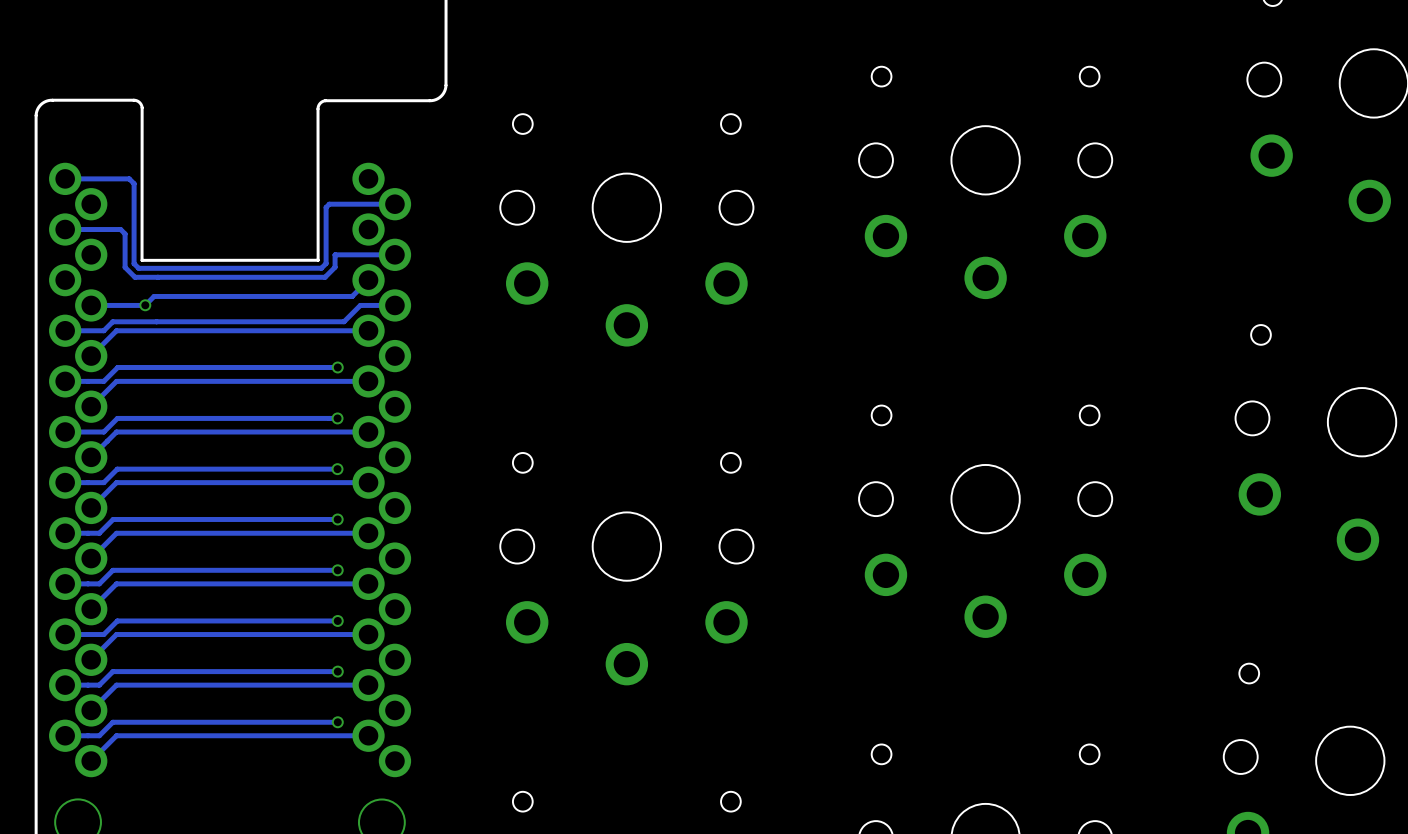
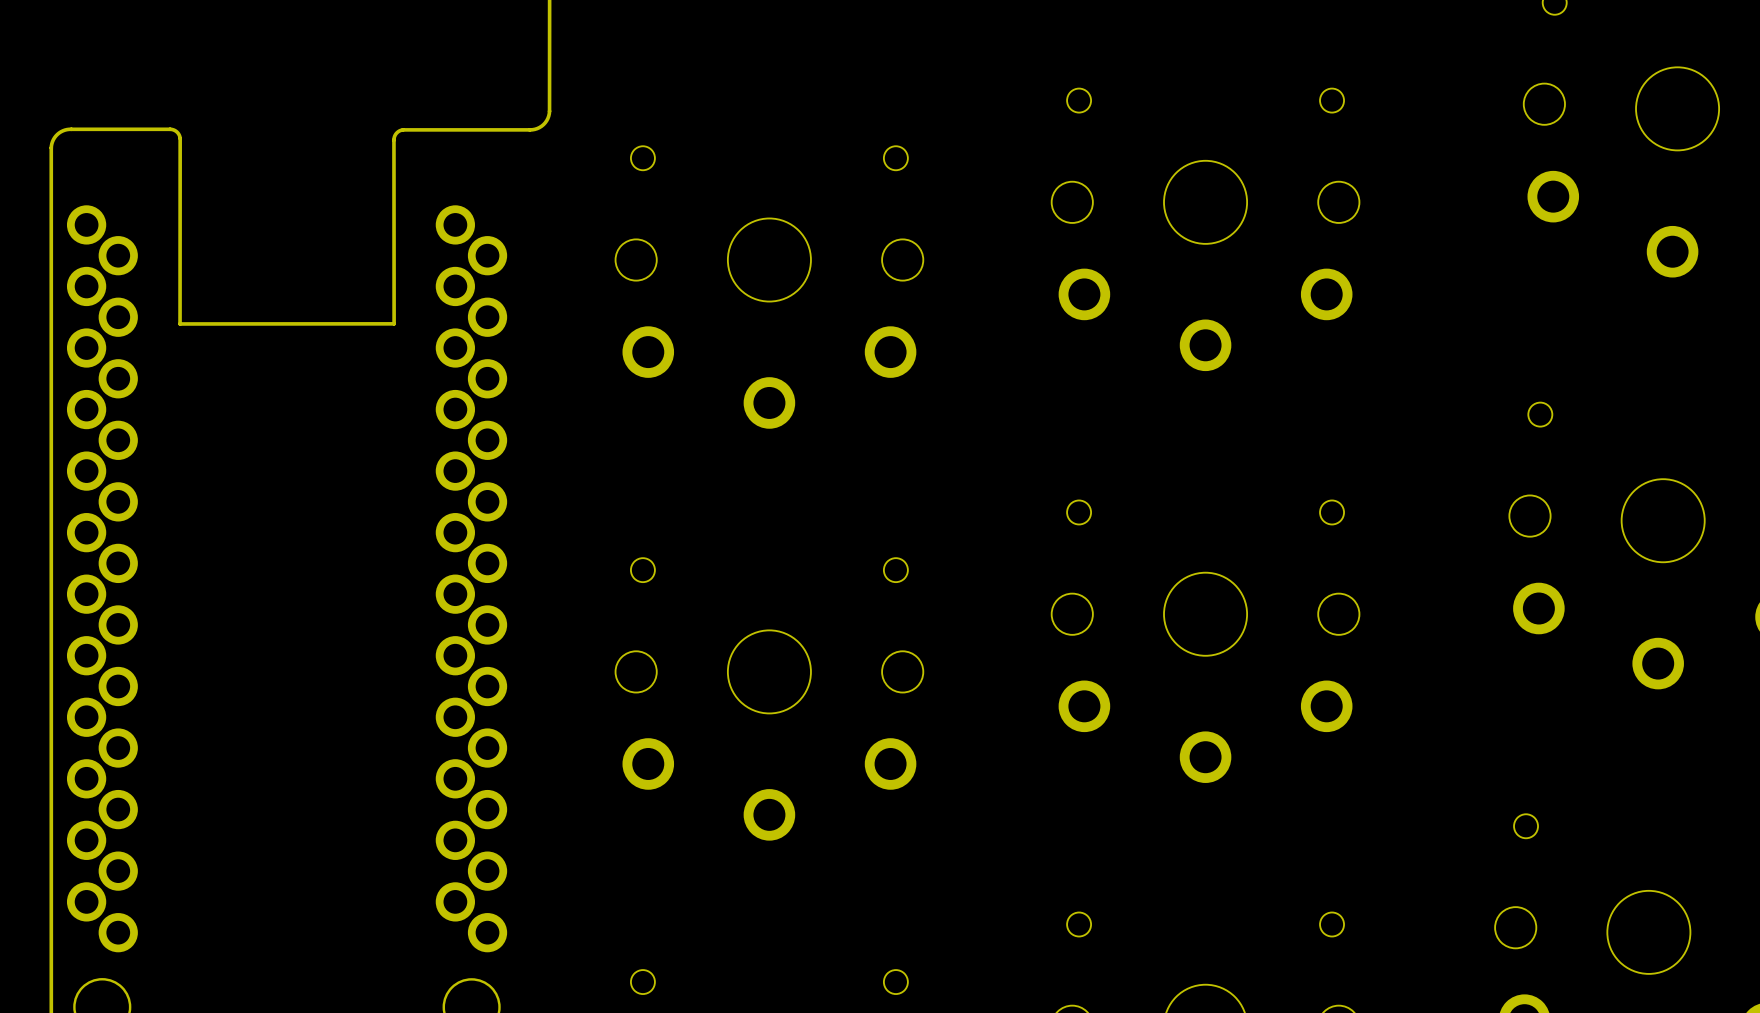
track: (65, 178) (129, 178) (134, 183) (134, 263) (138, 268) (321, 268) (326, 263) (326, 207) (329, 204) (394, 204) -> none
track: (65, 229) (120, 229) (125, 233) (125, 267) (135, 277) (325, 277) (335, 267) (335, 254) (394, 254) -> none
track: (368, 280) (352, 296) (154, 296) (145, 305) (91, 305) -> none
via: (145, 305) -> none
track: (394, 305) (360, 305) (344, 321) (156, 321) -> none
track: (156, 321) (112, 321) (103, 330) (65, 330) -> none
track: (368, 330) (116, 330) (91, 356) -> none
track: (337, 367) (117, 367) (103, 381) (65, 381) -> none
via: (337, 367) -> none
track: (368, 381) (116, 381) (91, 406) -> none
track: (337, 418) (117, 418) (103, 432) (65, 432) -> none
via: (337, 418) -> none
track: (368, 432) (116, 432) (91, 457) -> none
track: (337, 469) (117, 469) (103, 482) (65, 482) -> none
via: (337, 469) -> none
track: (368, 482) (116, 482) (91, 507) -> none
track: (337, 519) (113, 519) (99, 533) (65, 533) -> none
via: (337, 519) -> none
track: (368, 533) (116, 533) (91, 558) -> none
track: (337, 570) (112, 570) (99, 583) (65, 583) -> none
via: (337, 570) -> none
track: (368, 583) (116, 583) (91, 609) -> none
track: (337, 620) (117, 620) (103, 634) (65, 634) -> none
via: (337, 620) -> none
track: (368, 634) (116, 634) (91, 659) -> none
track: (337, 671) (112, 671) (99, 685) (65, 685) -> none
via: (337, 671) -> none
track: (368, 685) (116, 685) (91, 710) -> none
track: (337, 722) (112, 722) (99, 735) (65, 735) -> none
via: (337, 722) -> none
track: (368, 735) (116, 735) (91, 761) -> none

